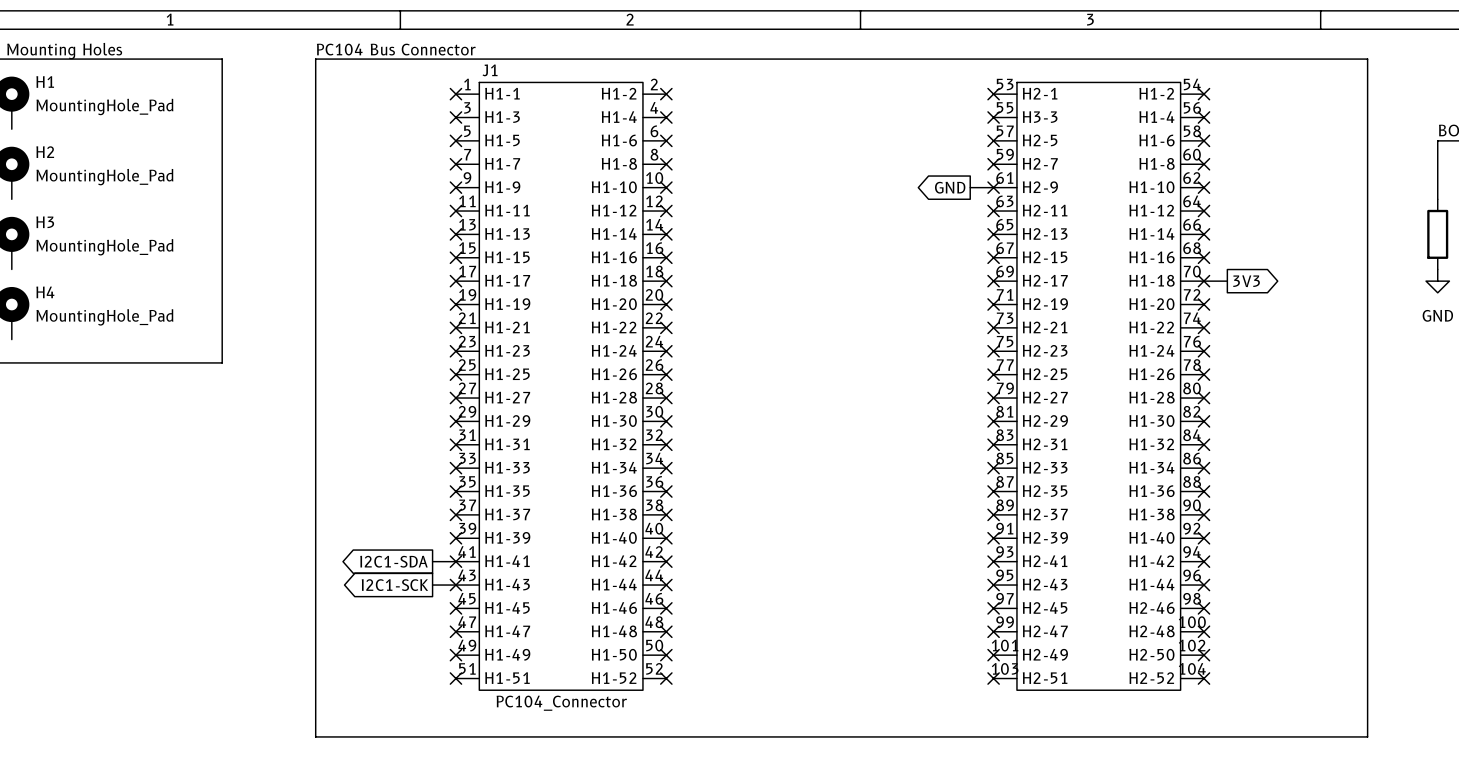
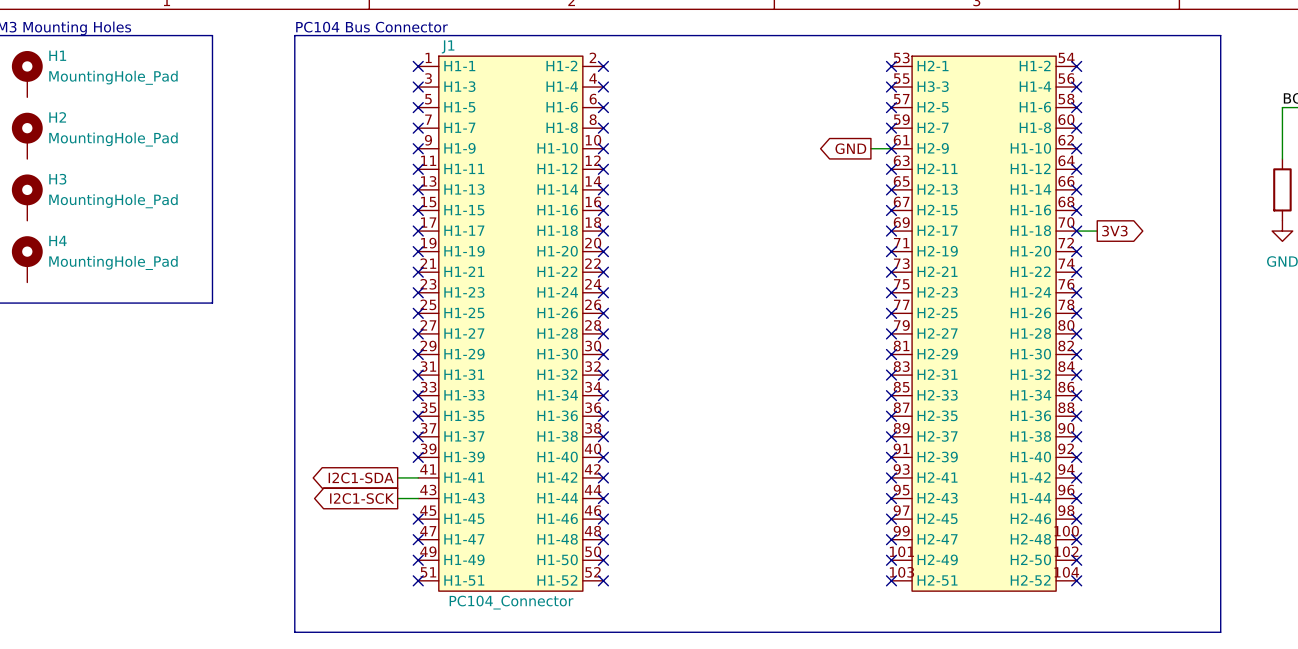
no-connect mark: (455, 561) -> none
no-connect mark: (455, 585) -> none

